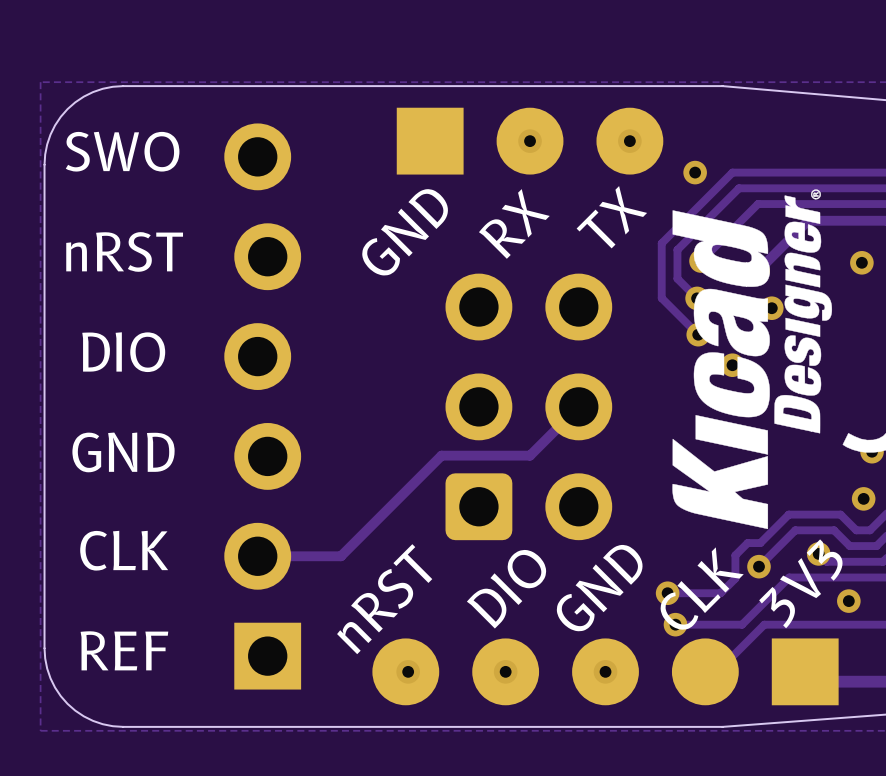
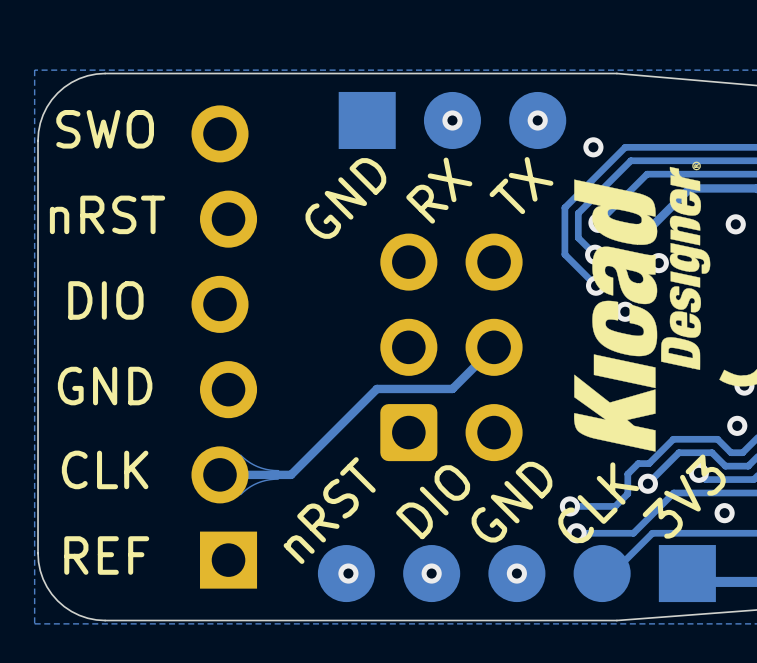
zone outline: none -> (240, 454) (205, 474) (240, 494) (257, 483) (278, 479) (278, 470) (257, 466) (240, 454)

